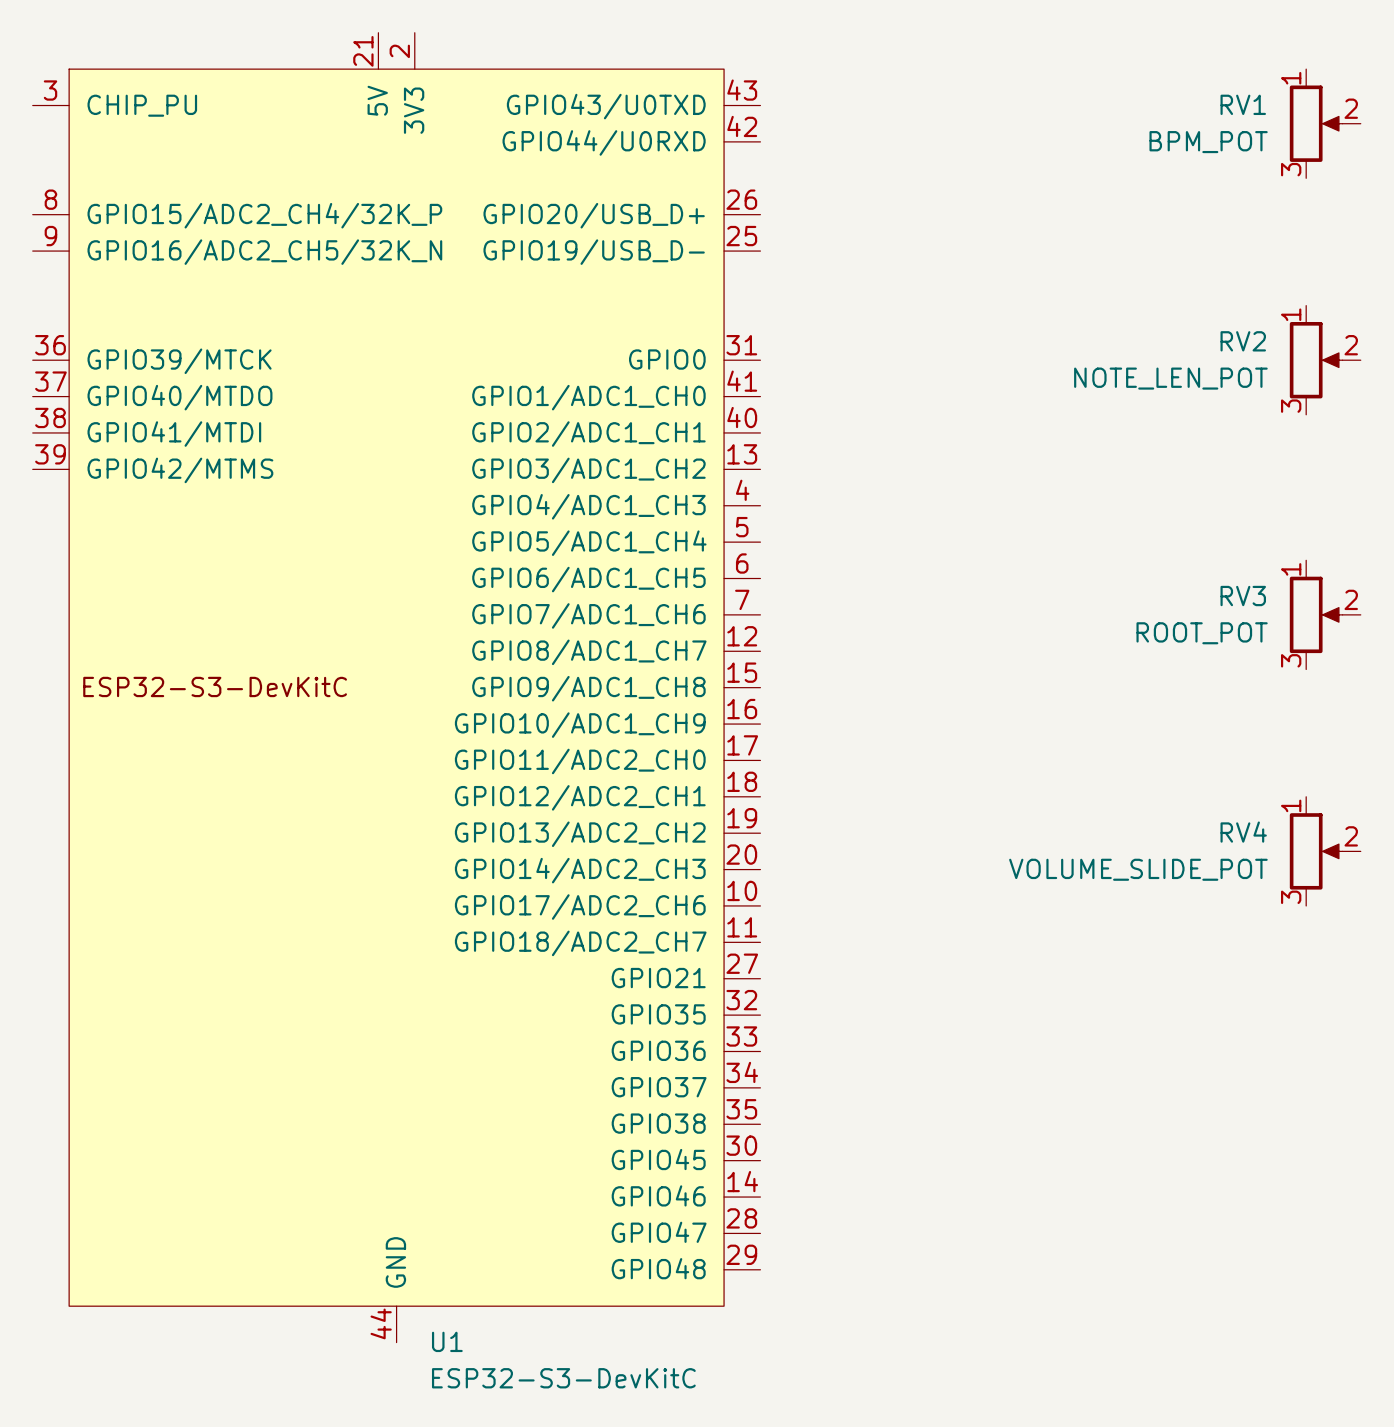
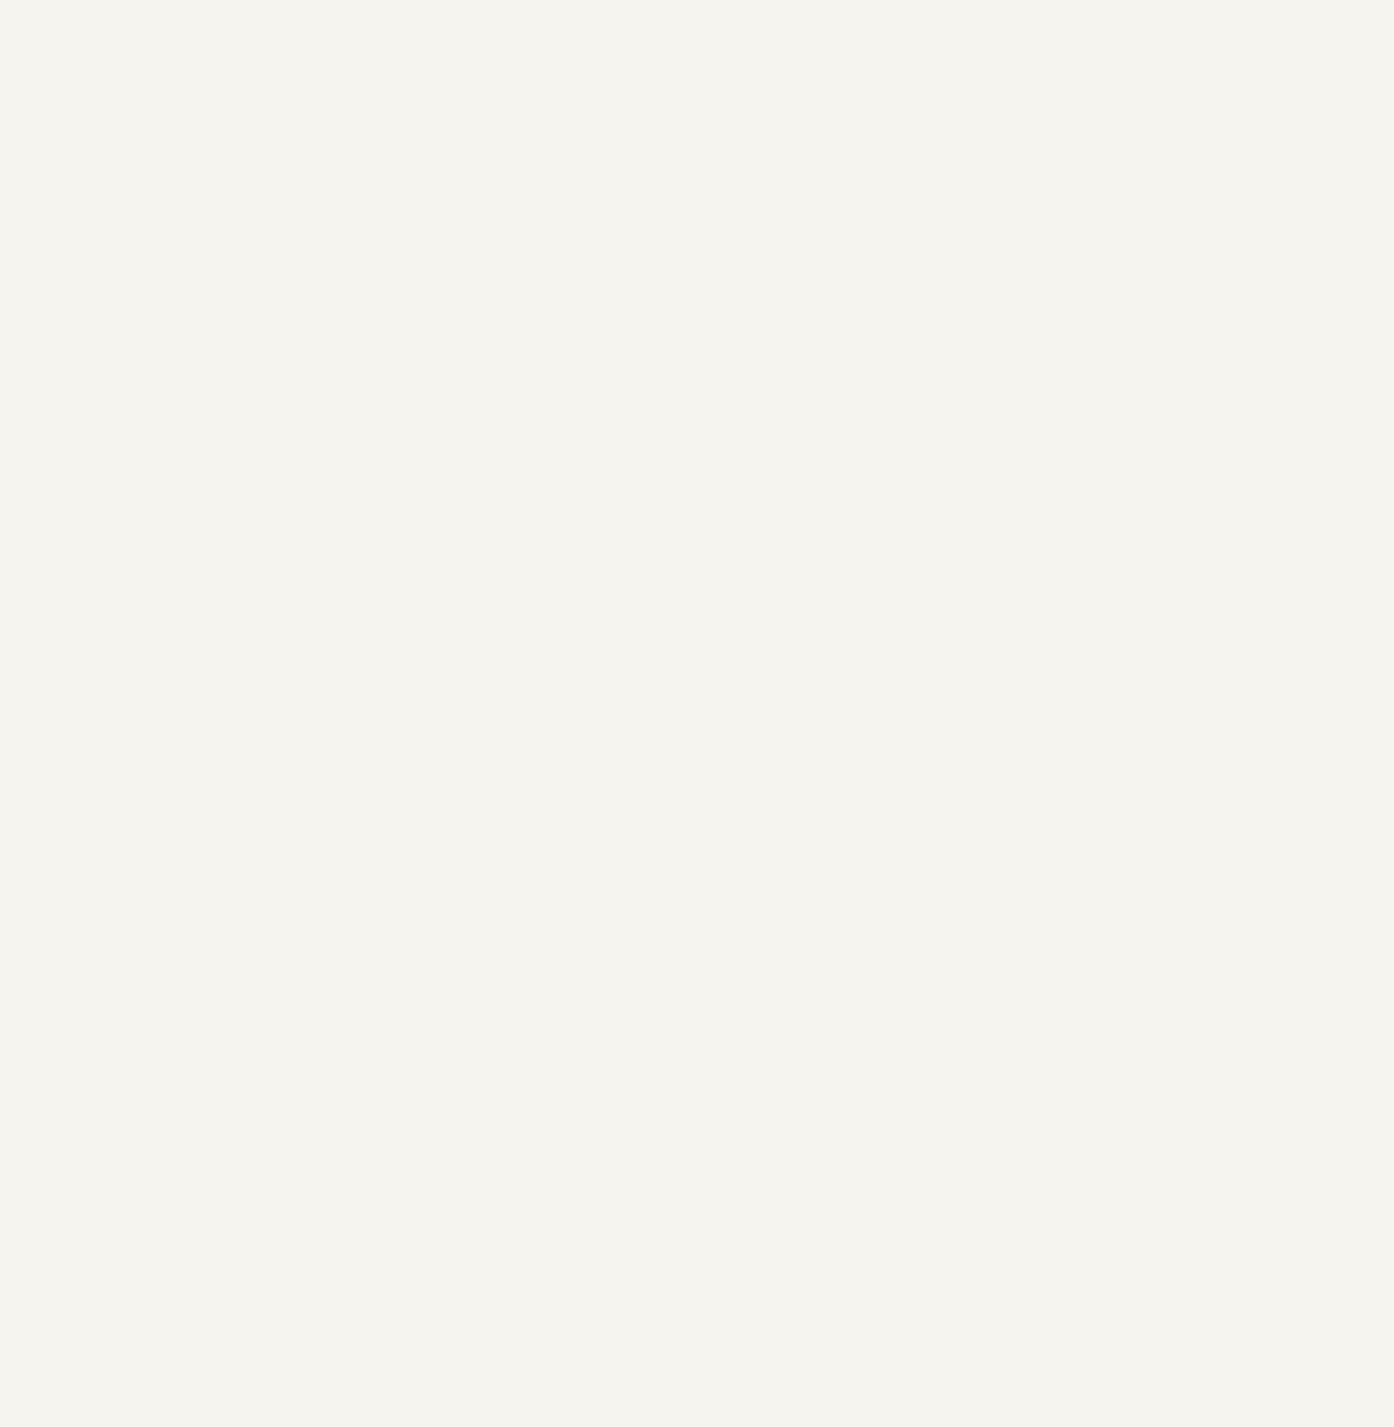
RV1: BPM_POT (1325, 123) -> none
RV2: NOTE_LEN_POT (1325, 360) -> none
RV3: ROOT_POT (1325, 614) -> none
U1: ESP32-S3-DevKitC (396, 687) -> none
RV4: VOLUME_SLIDE_POT (1325, 851) -> none

